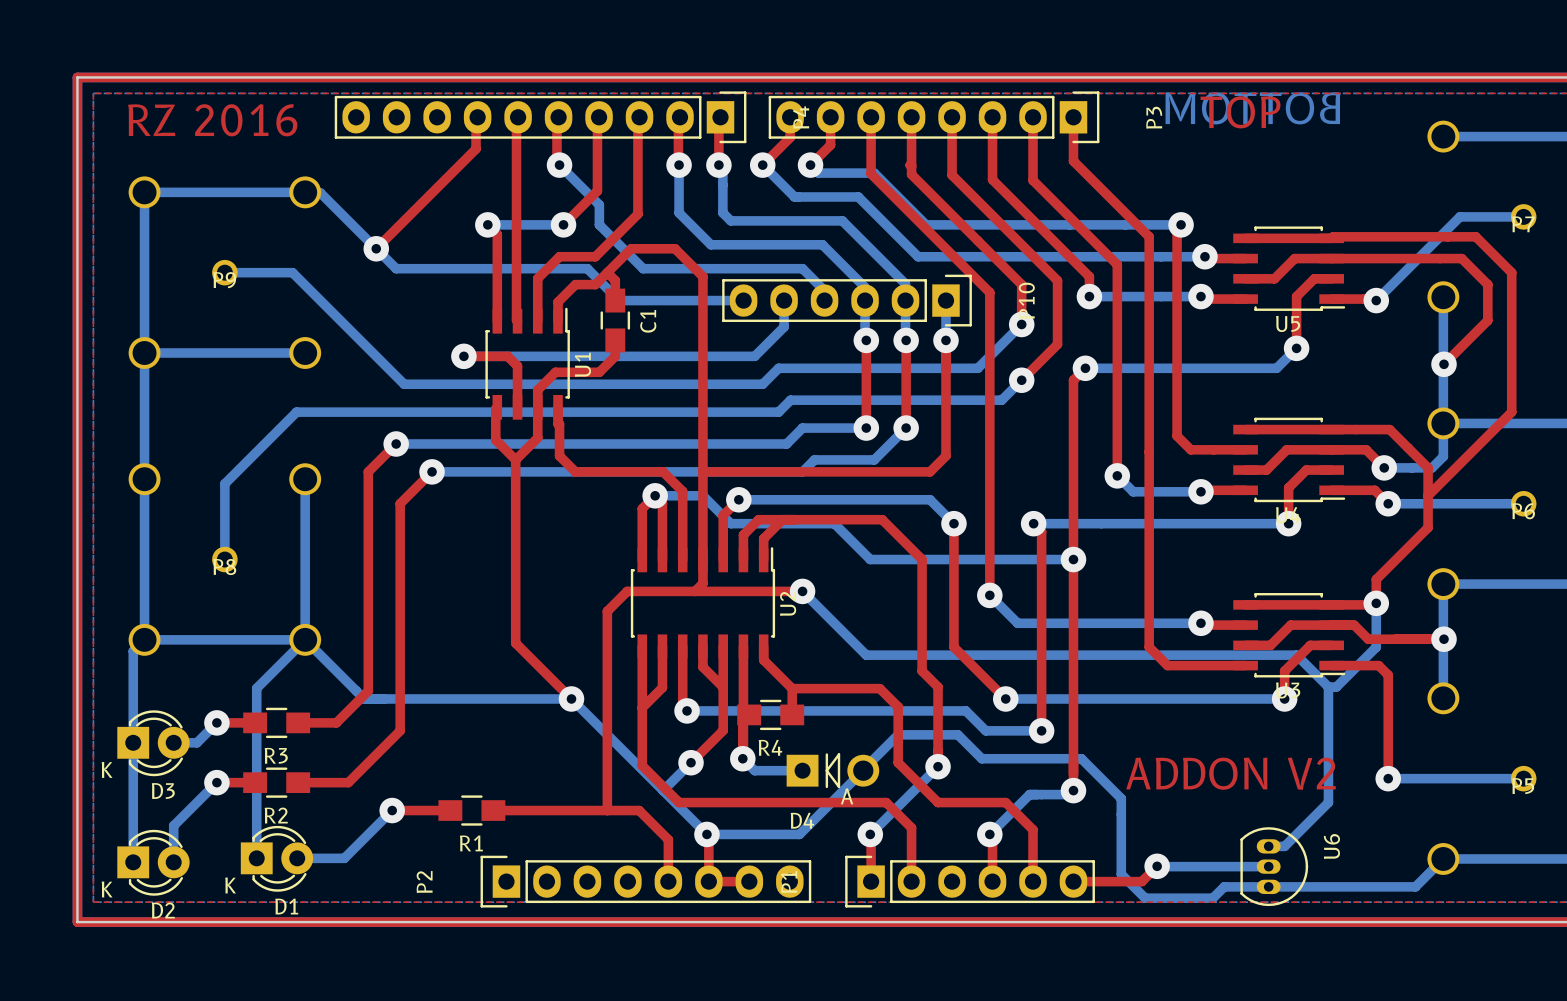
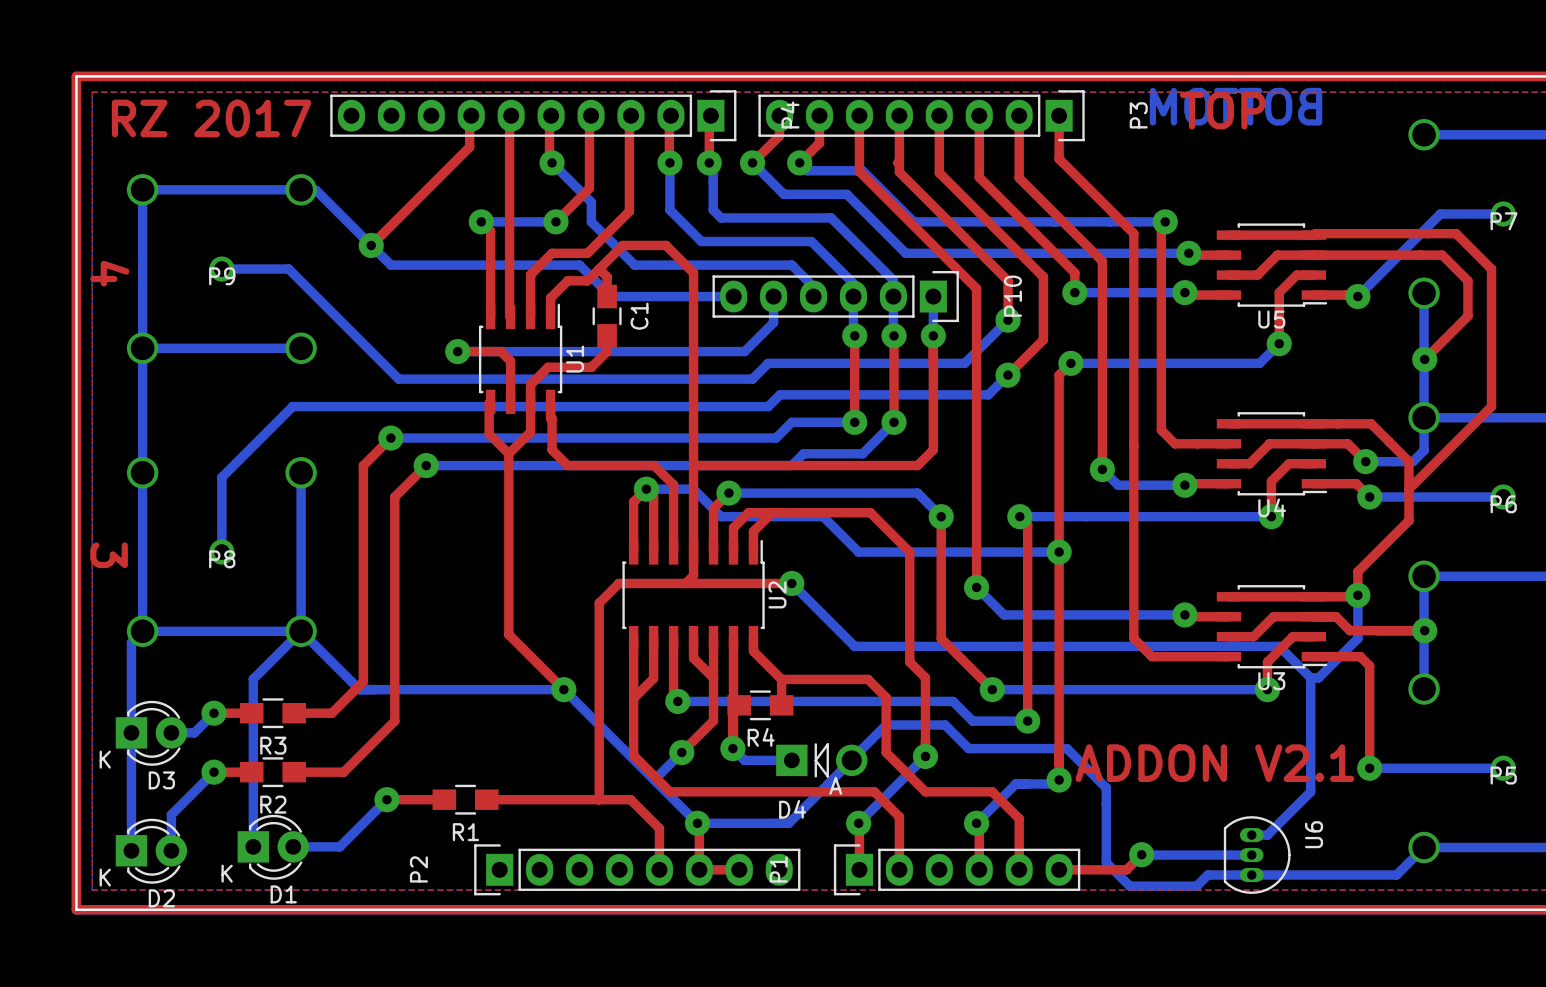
text: RZ 2016 (212, 120) -> RZ 2017 (211, 118)
text: none -> 4 (109, 273)
text: none -> 3 (109, 555)
text: ADDON V2 (1230, 773) -> ADDON V2.1 (1214, 763)

